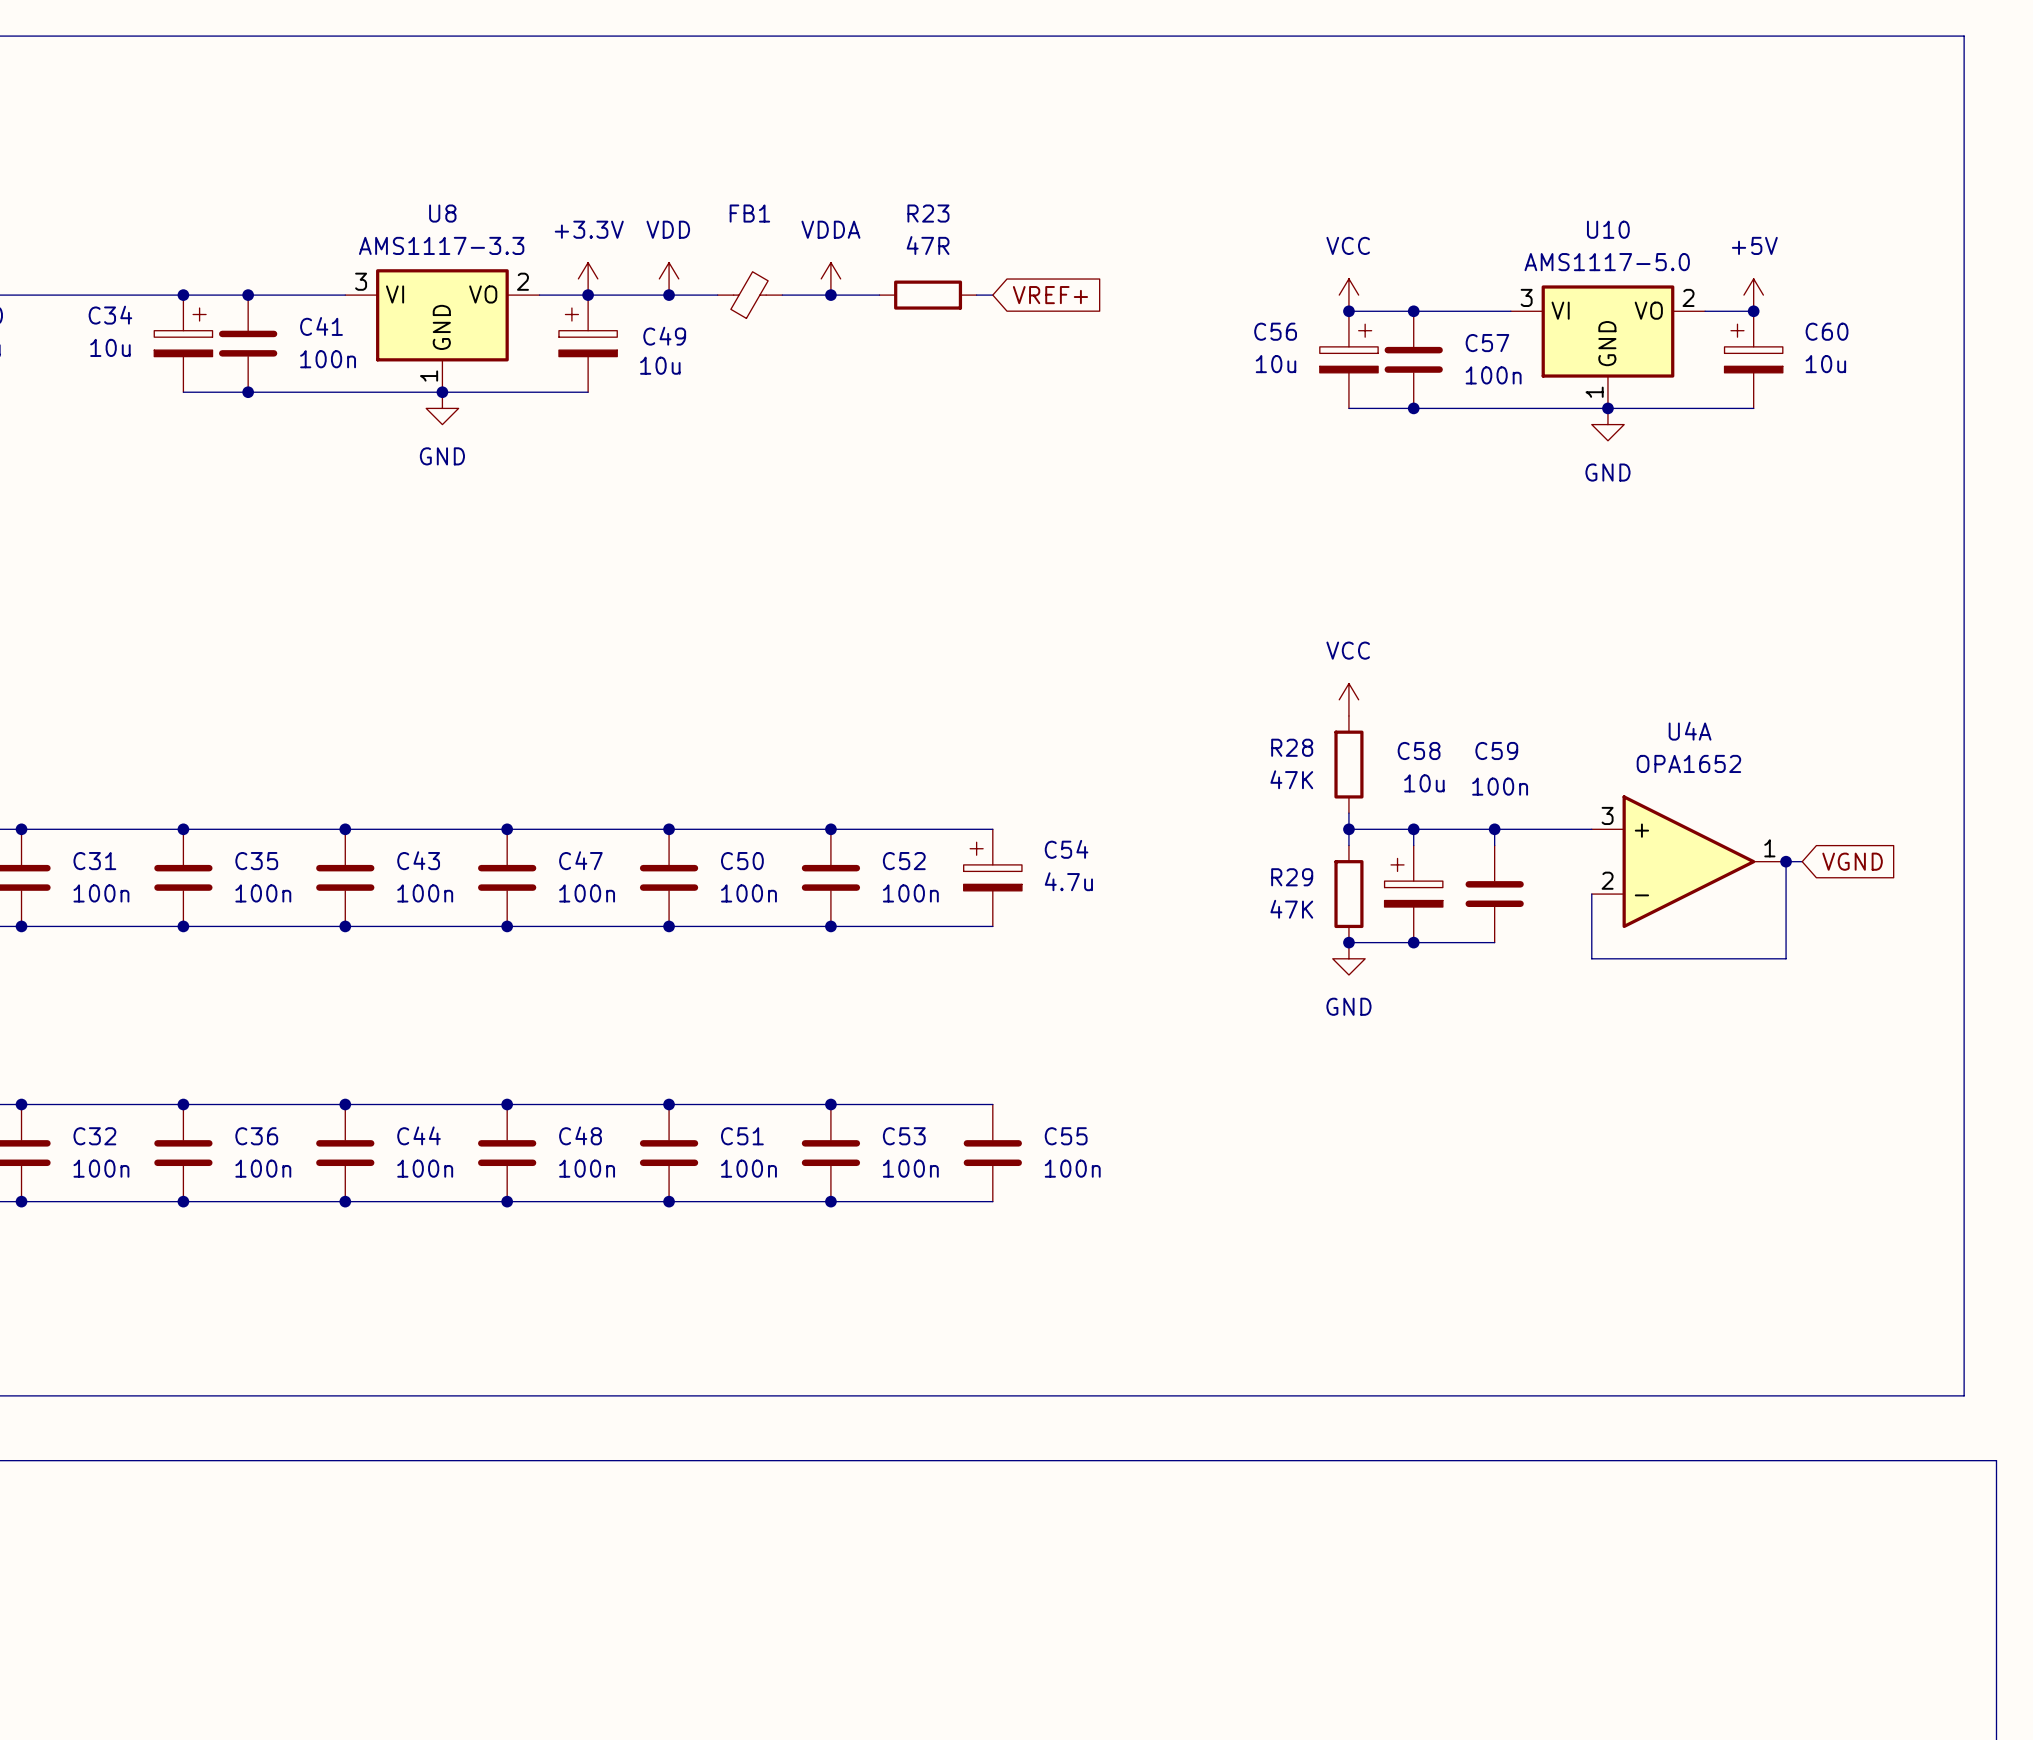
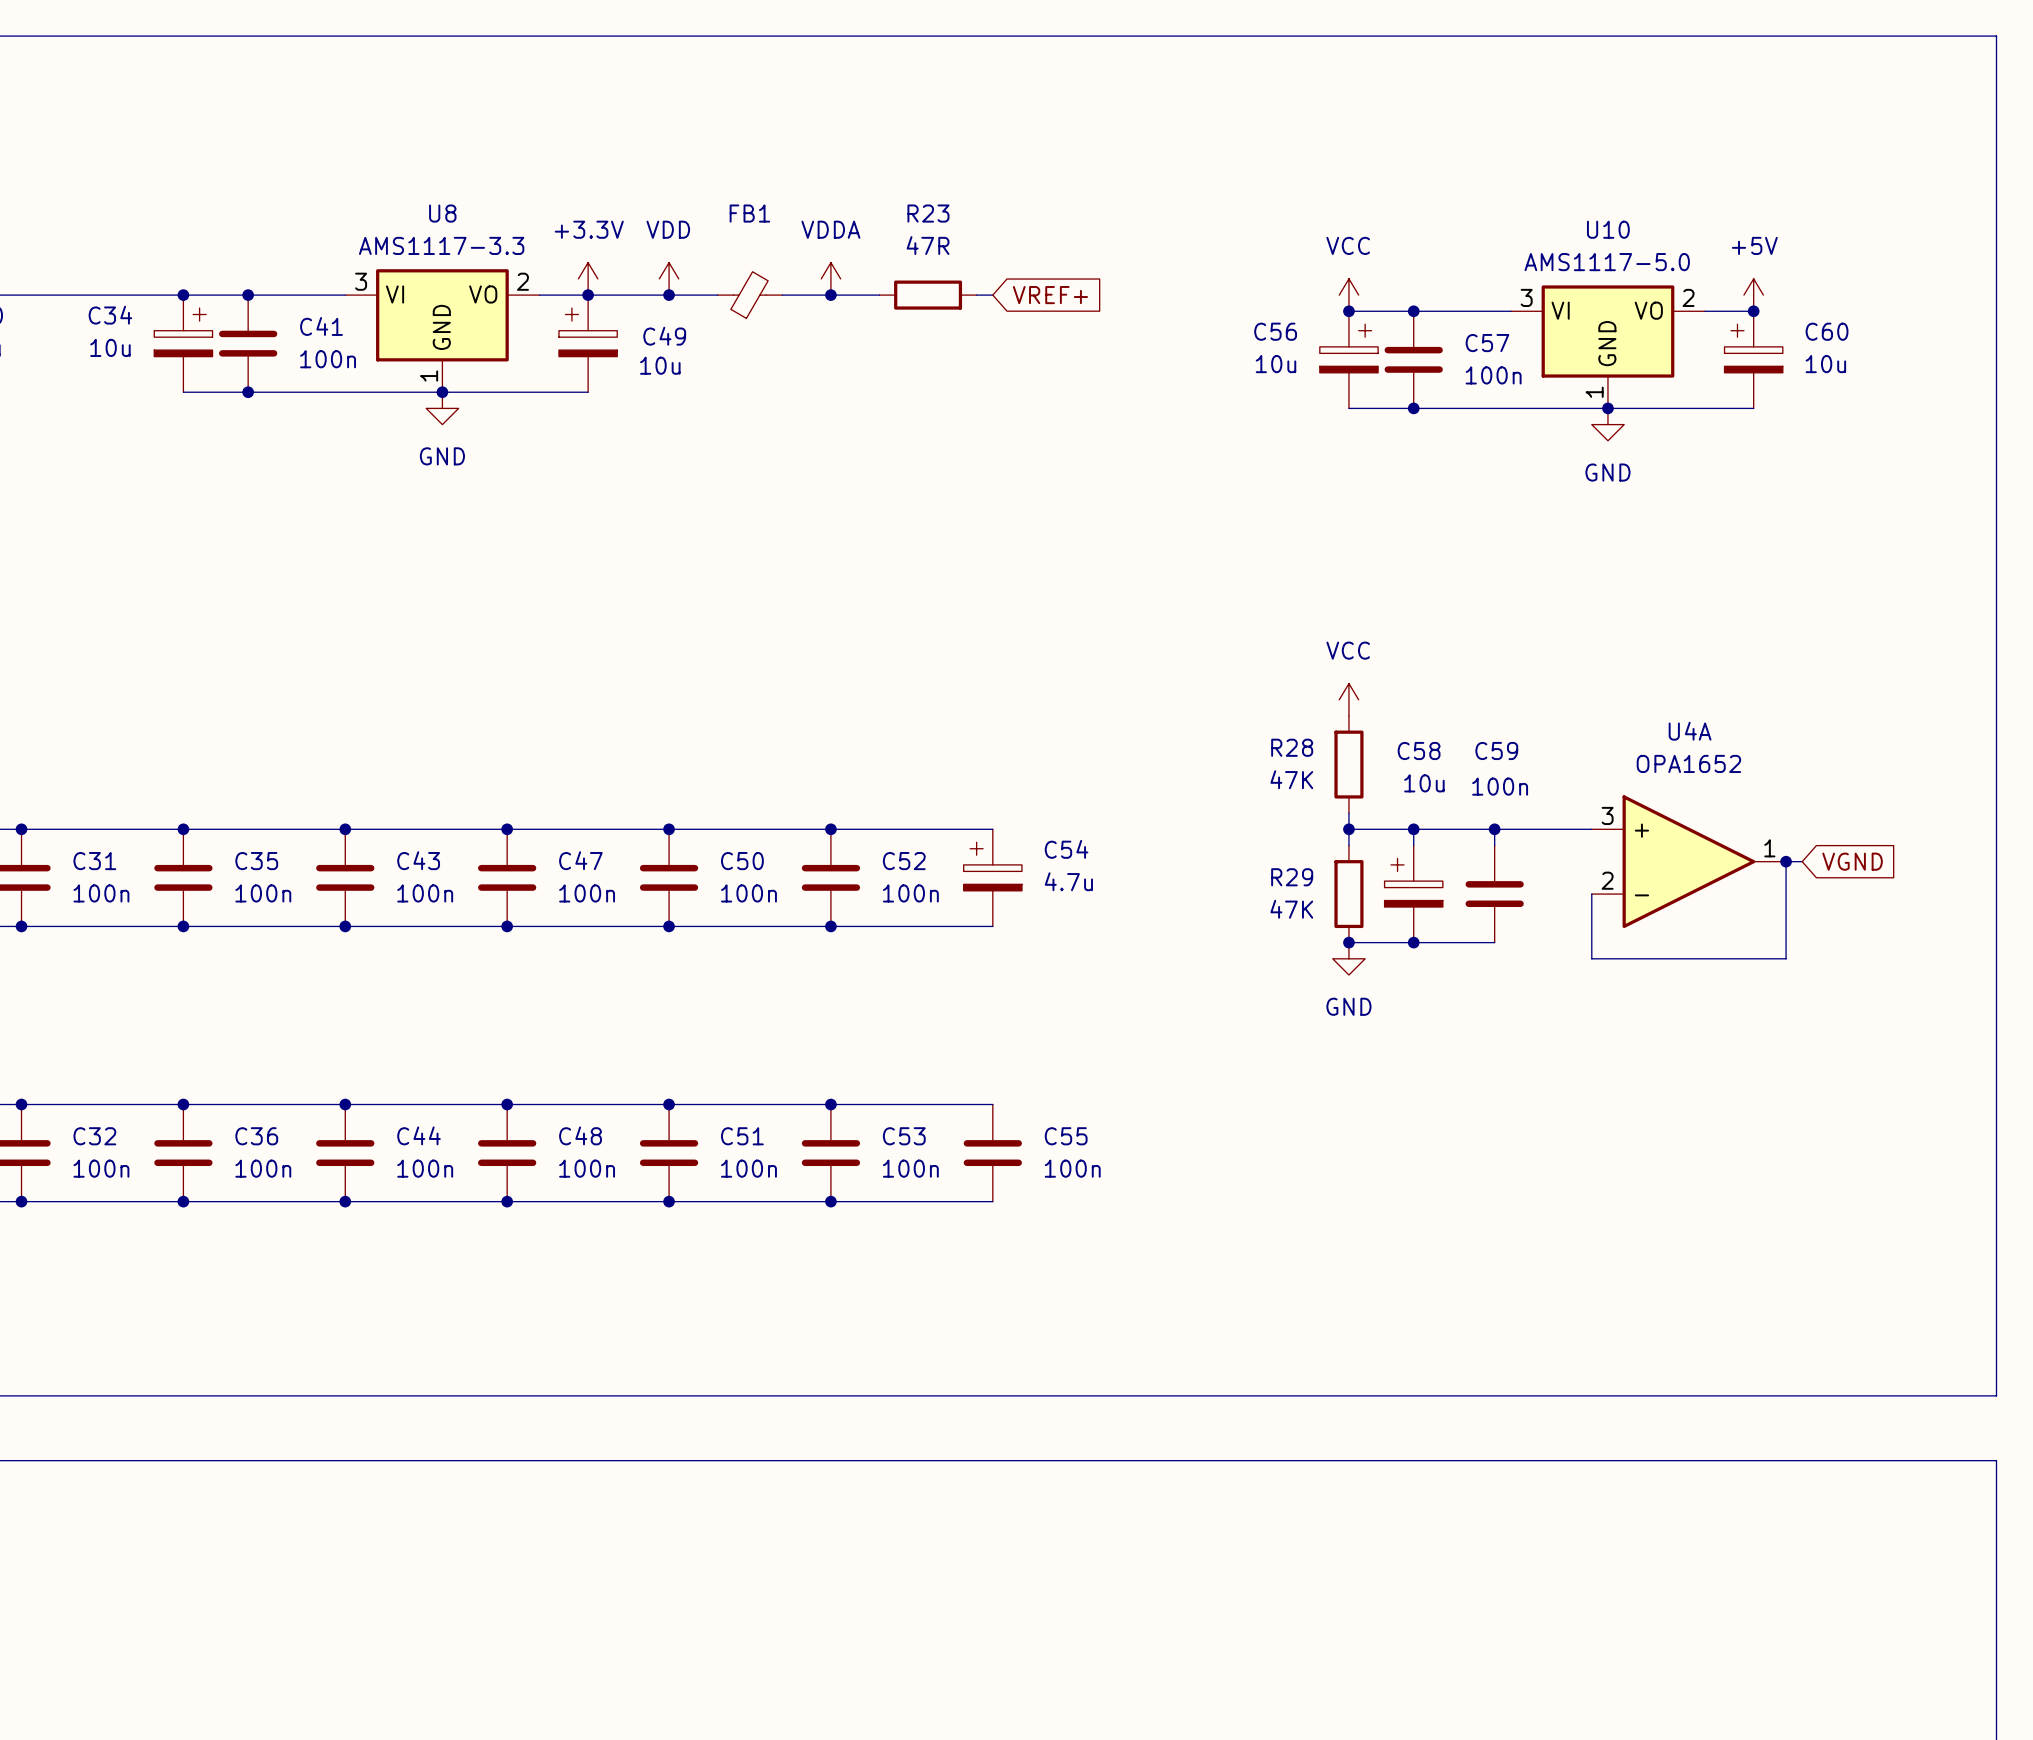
line: (1964, 36) (1964, 1395) -> (1964, 36) (1996, 36) (1996, 1395) (1964, 1395)

